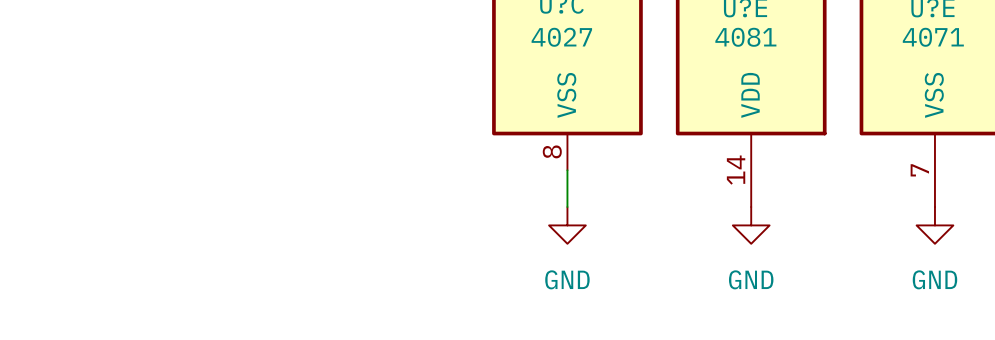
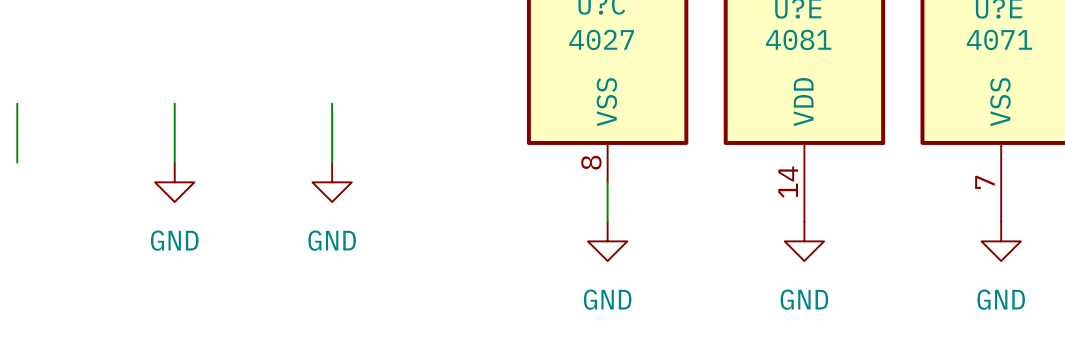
wire: none -> (17, 103) (17, 162)
wire: none -> (174, 103) (174, 162)
wire: none -> (332, 103) (332, 162)
power symbol: none -> GND (174, 182)
power symbol: none -> GND (332, 182)

